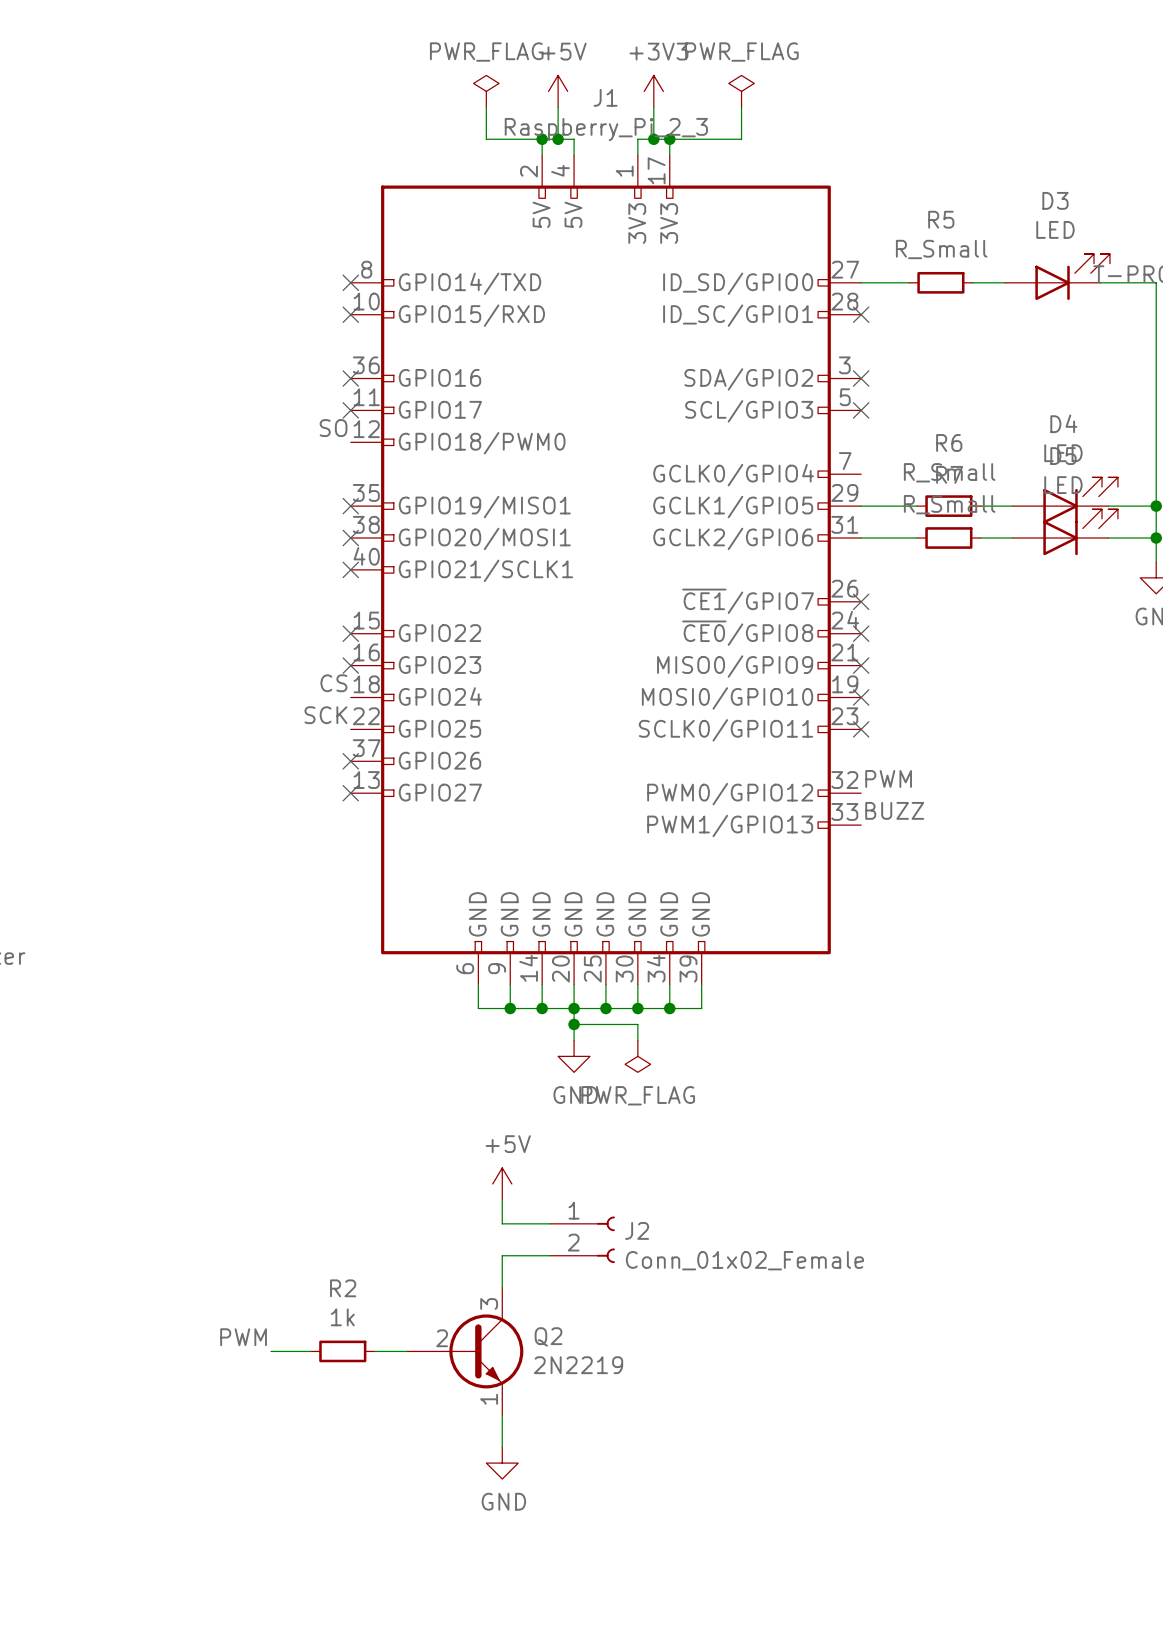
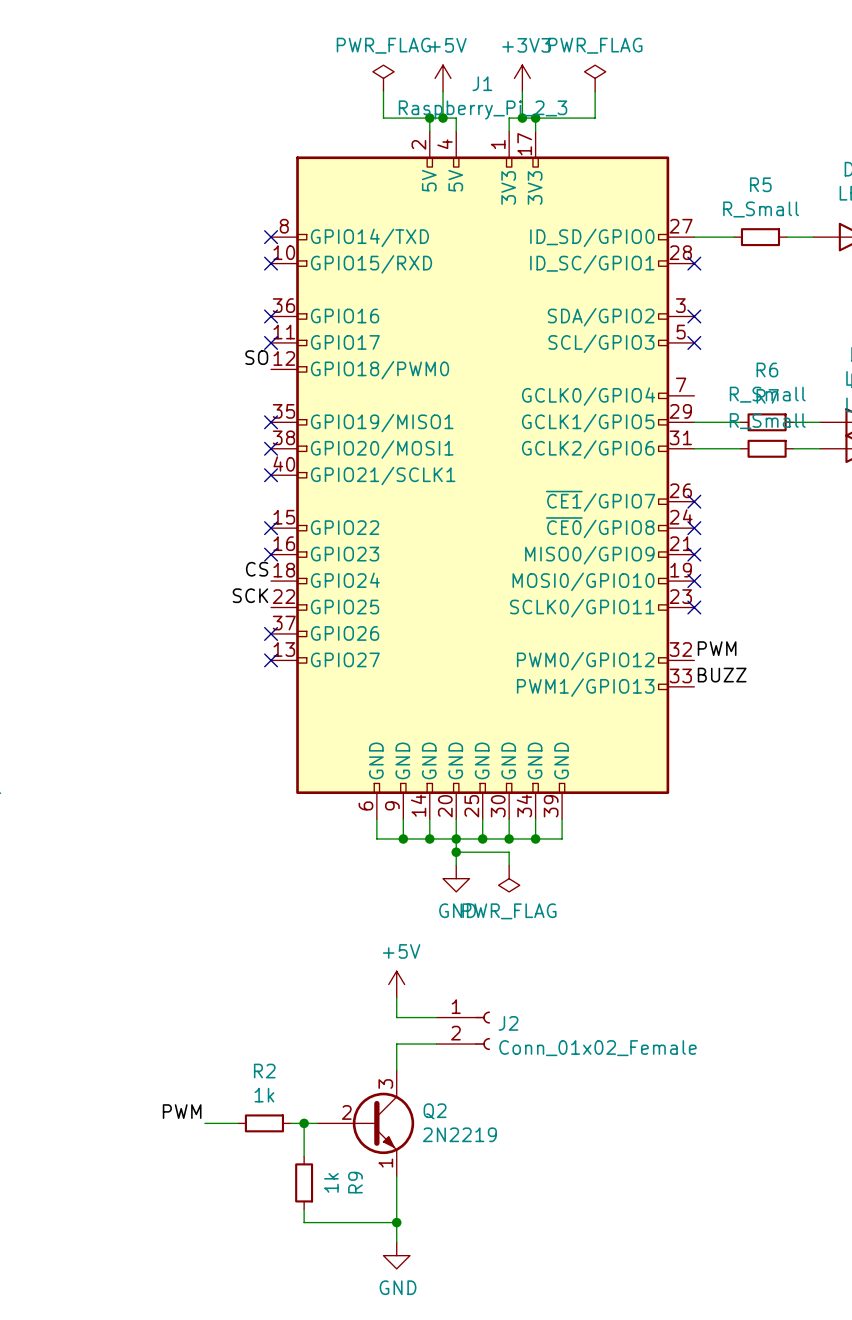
wire: none -> (304, 1123) (304, 1156)
junction: none -> (304, 1123)
R9: none -> 1k (304, 1182)
wire: none -> (396, 1202) (396, 1242)
wire: none -> (304, 1209) (304, 1222) (396, 1222)
power symbol position: GND (502, 1463) -> GND (396, 1255)
junction: none -> (396, 1222)

